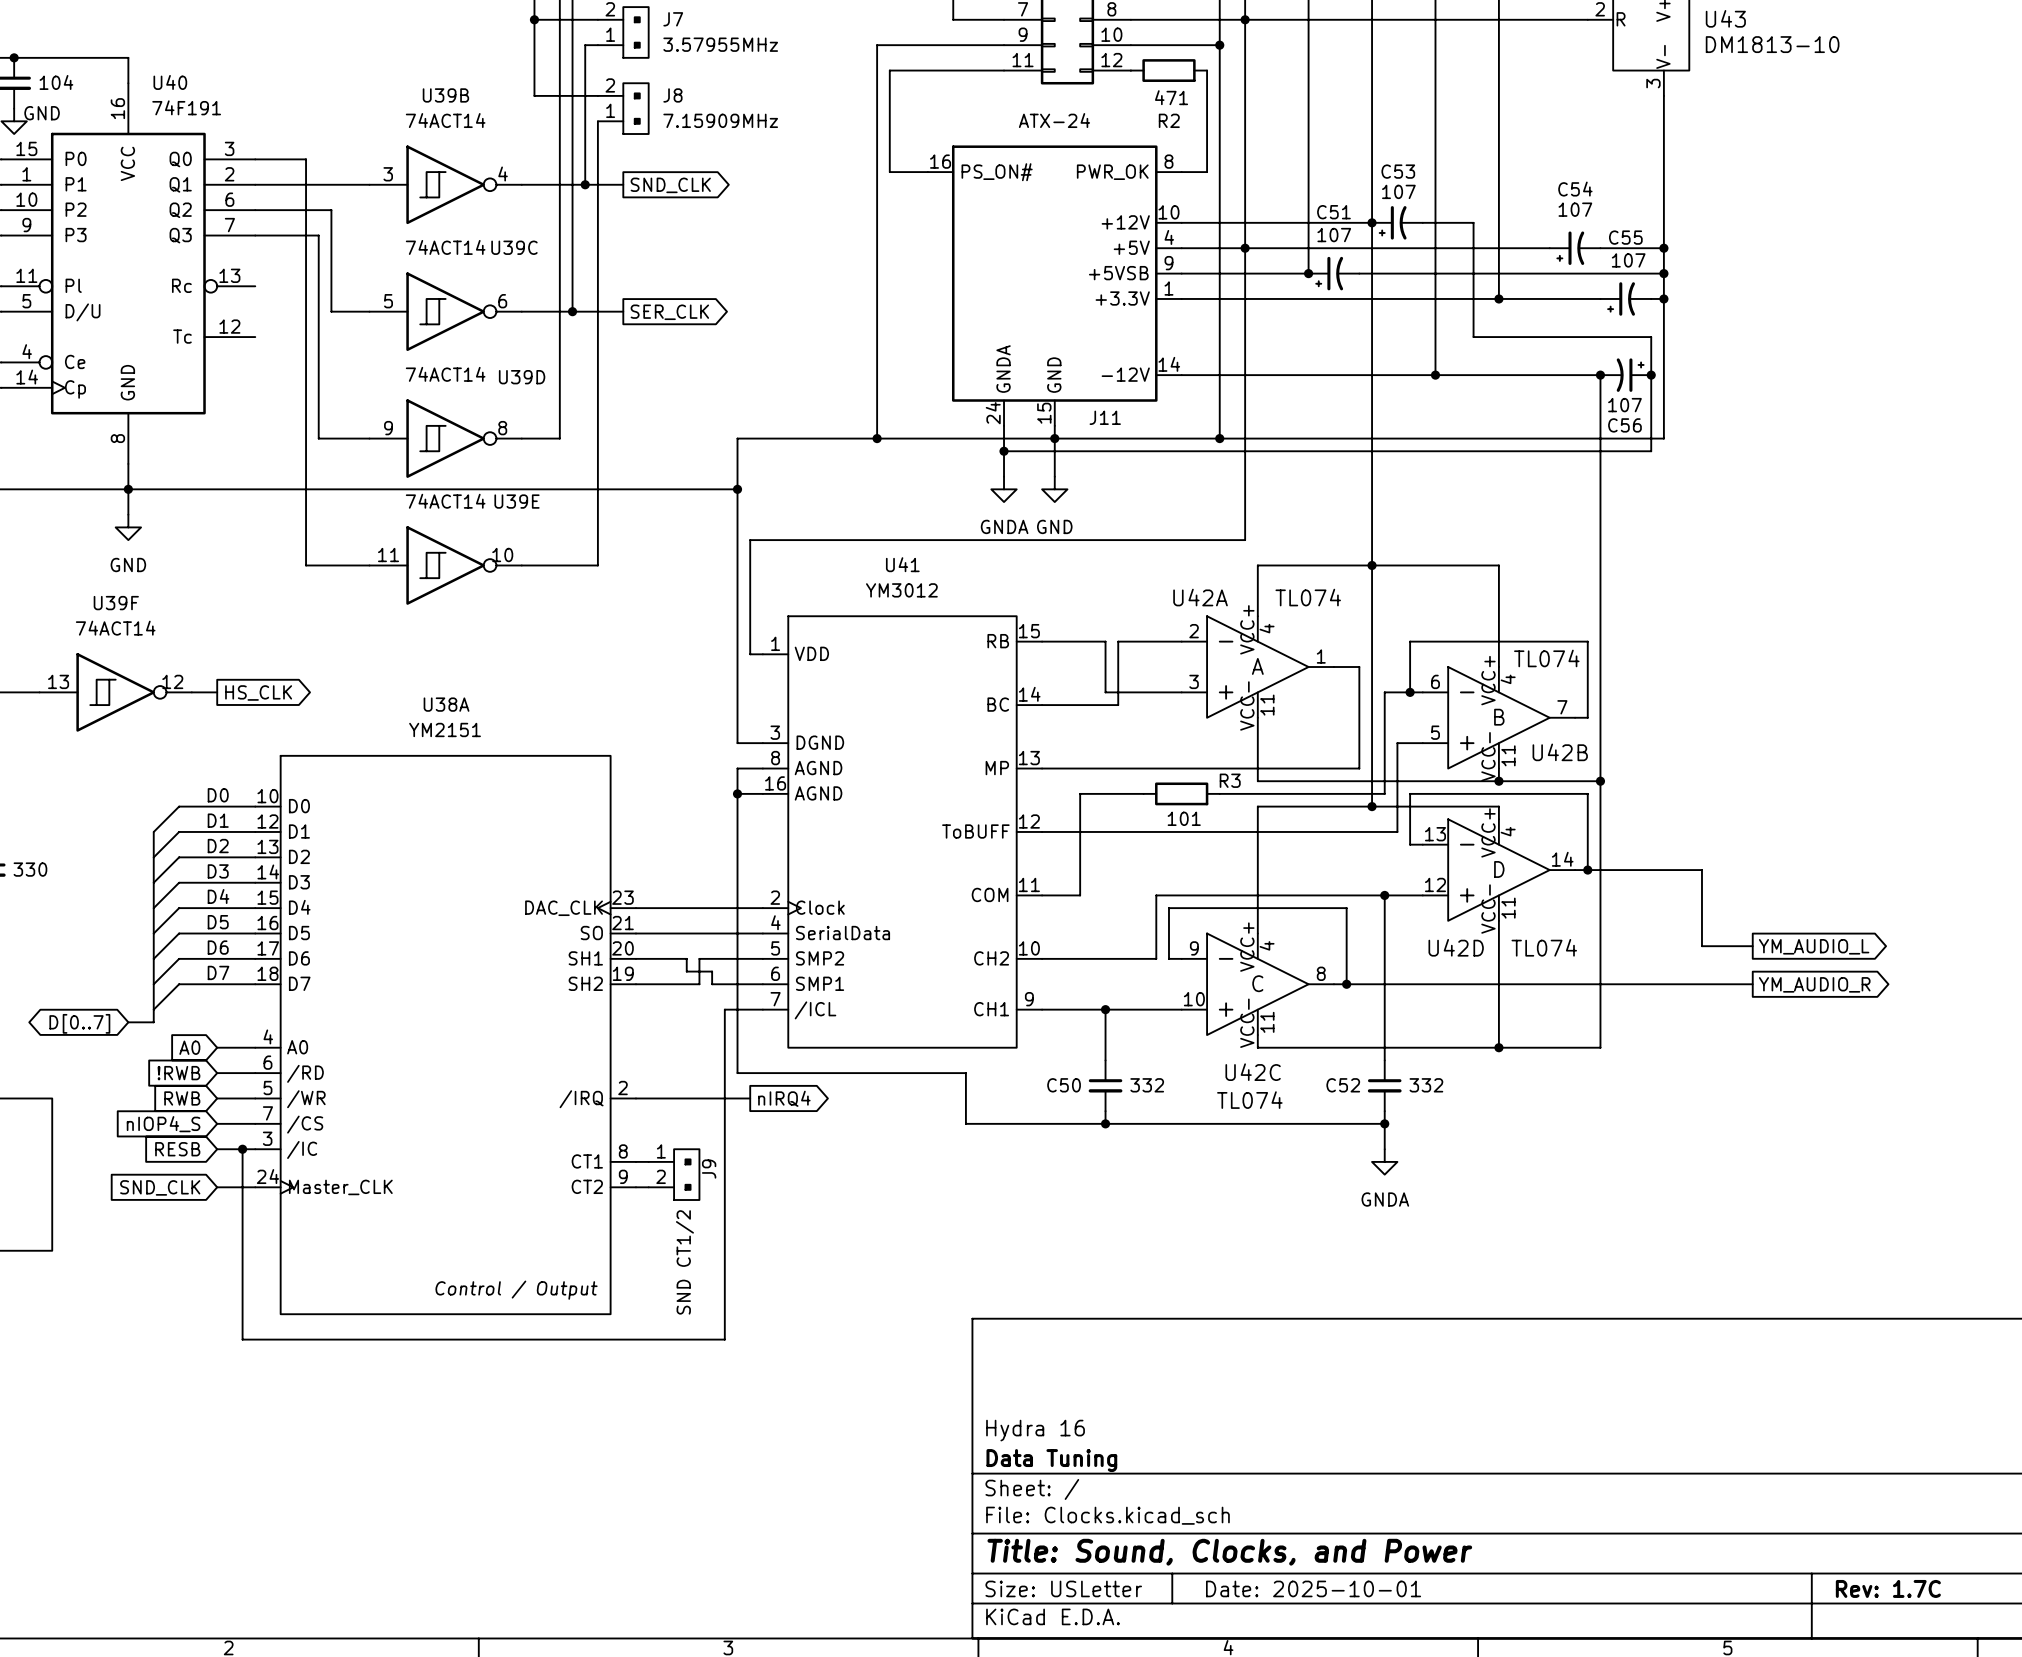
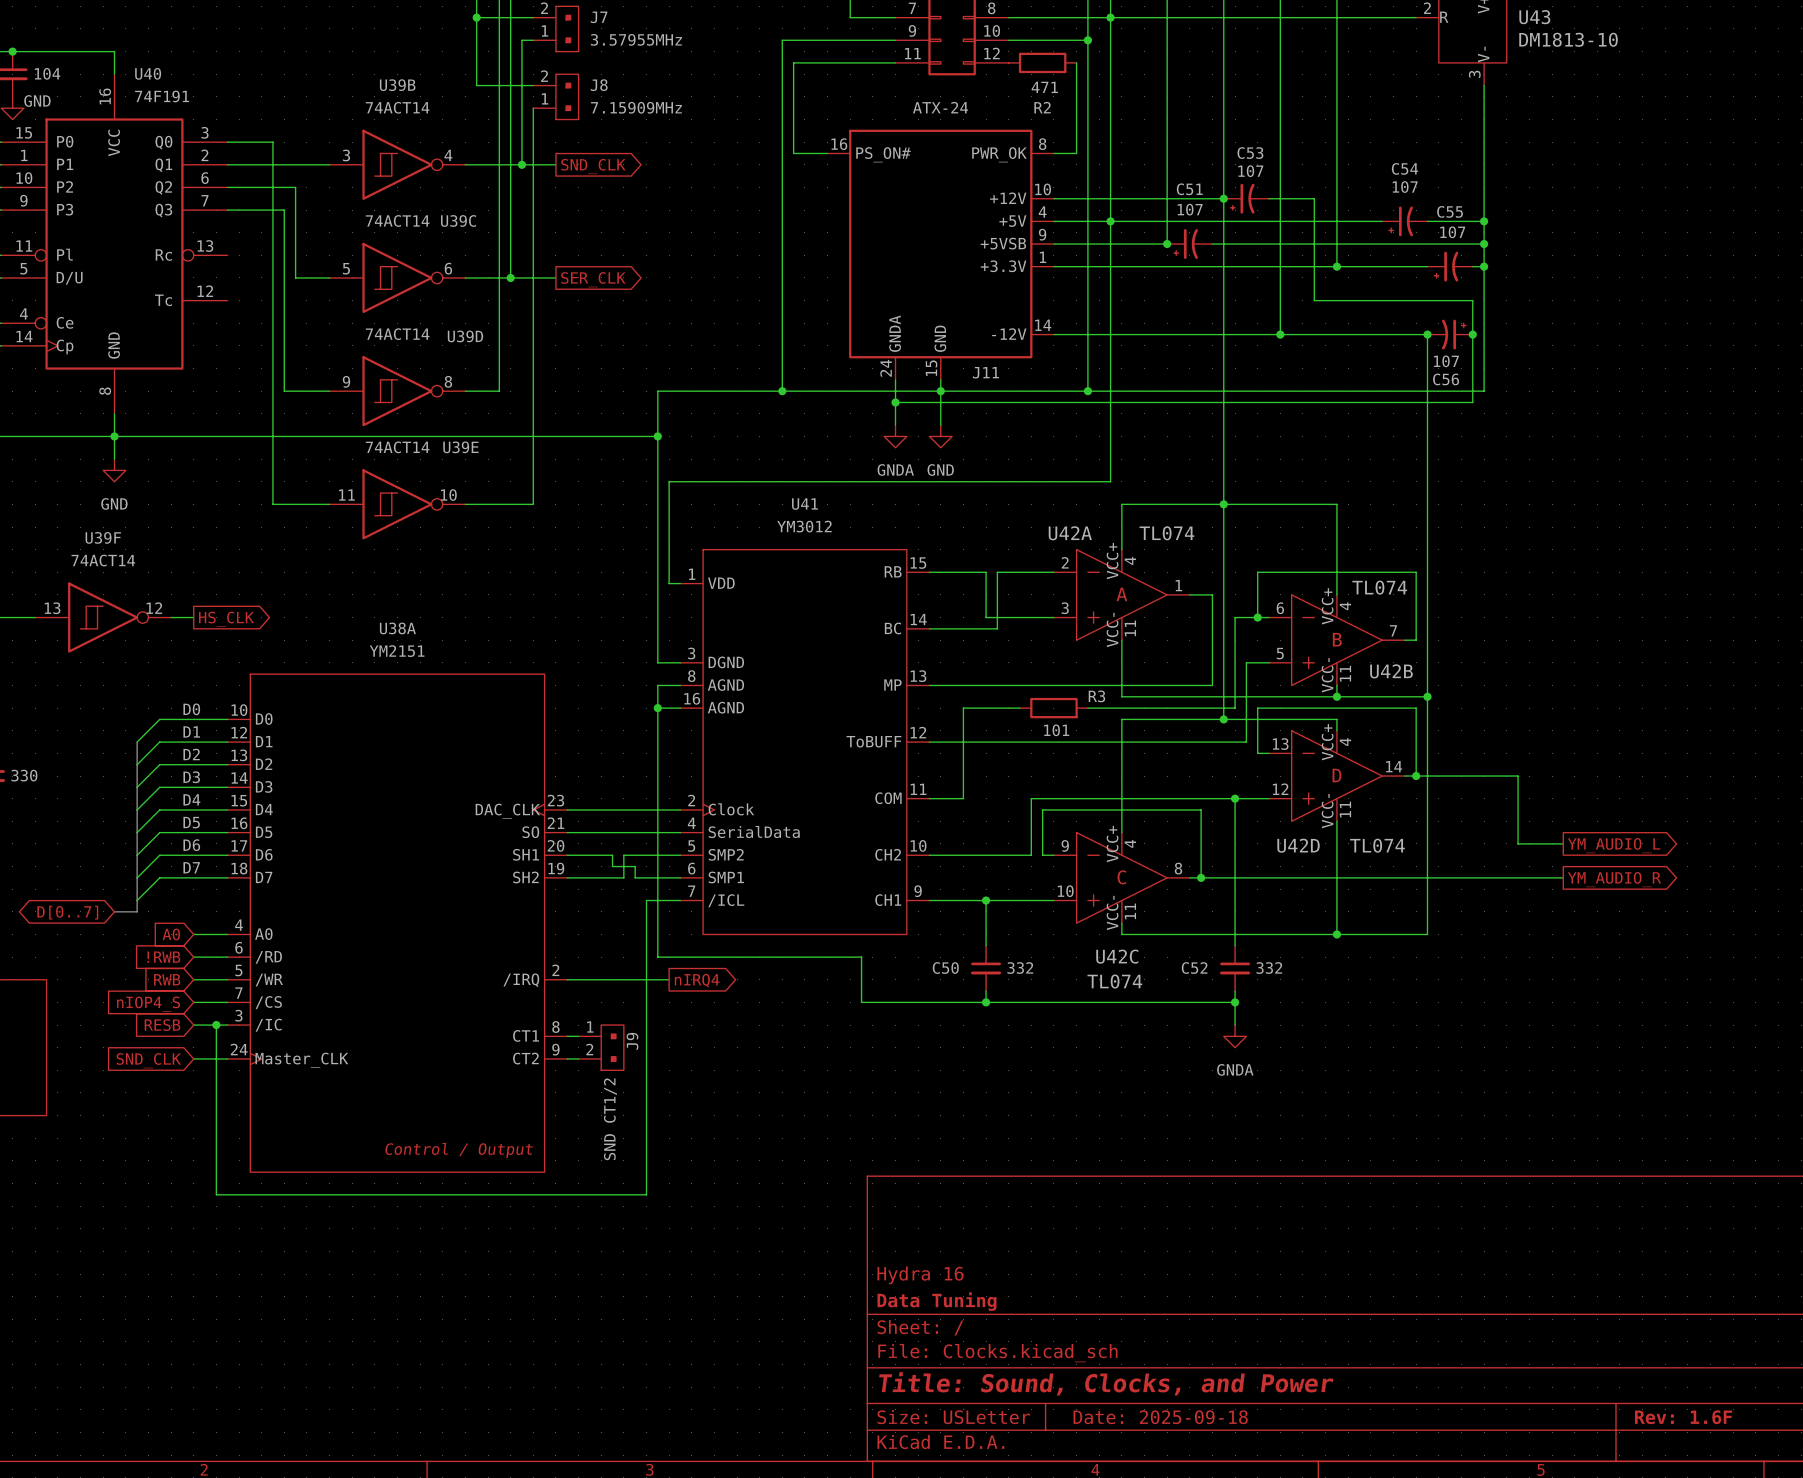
title block: Date: 2025-10-01 (1313, 1588) -> Date: 2025-09-18 (1160, 1417)
title block: Rev: 1.7C (1888, 1588) -> Rev: 1.6F (1683, 1417)

